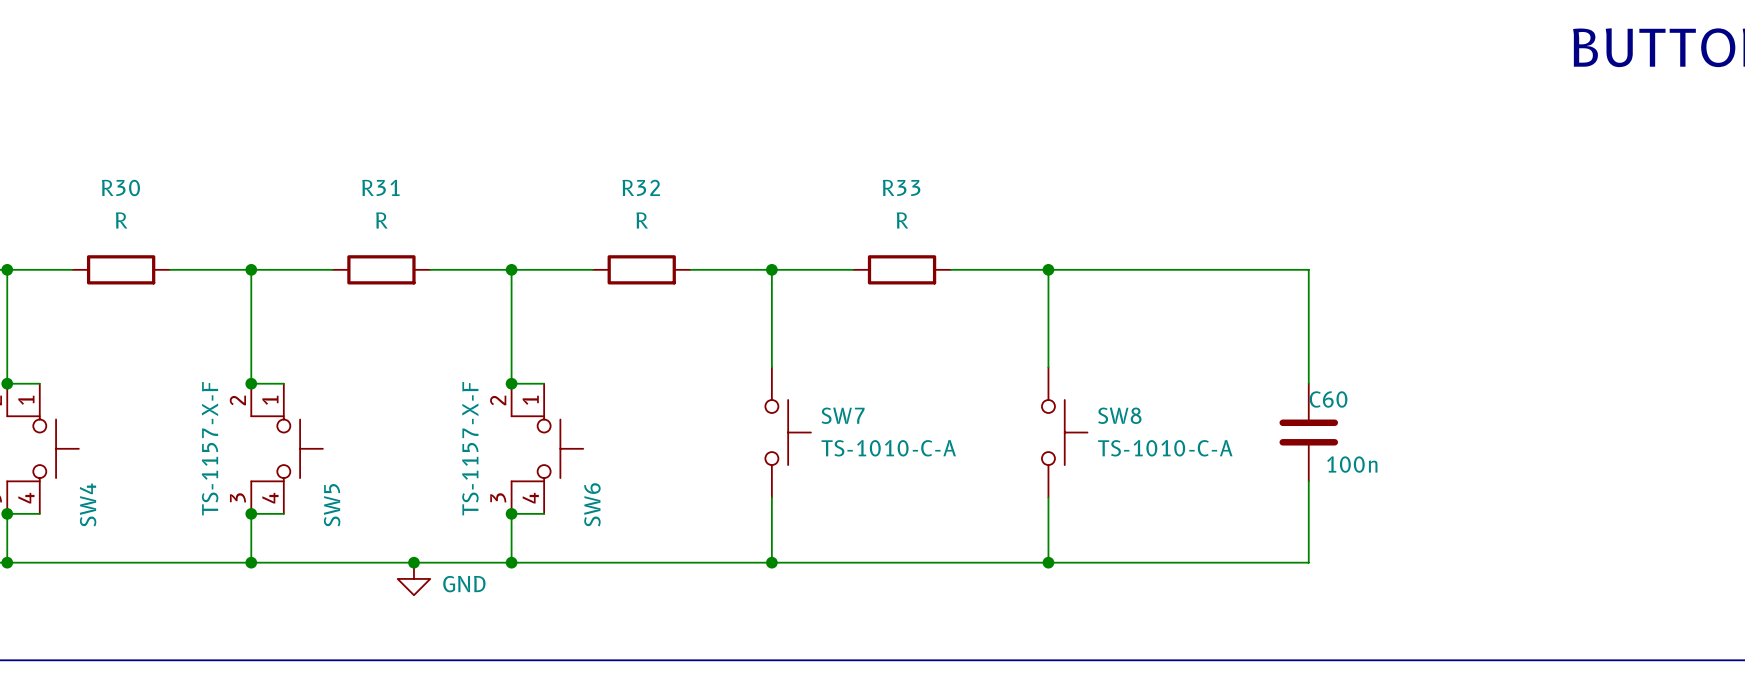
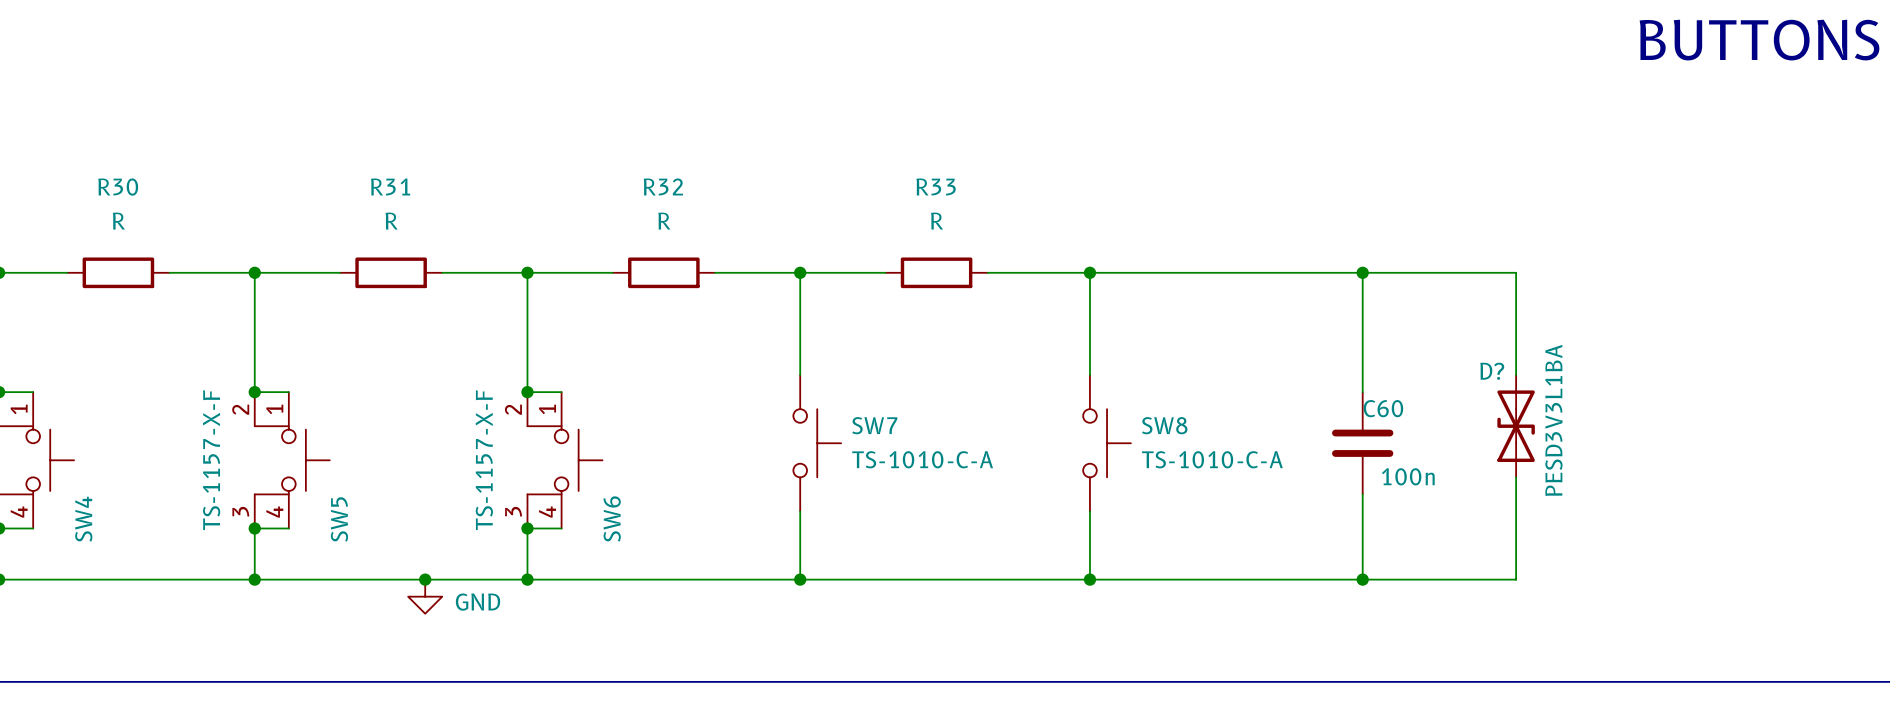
wire: none -> (1362, 272) (1516, 272) (1516, 375)
junction: none -> (1362, 272)
D?: none -> PESD3V3L1BA (1516, 426)
wire: none -> (1516, 477) (1516, 579) (1362, 579)
junction: none -> (1362, 579)

